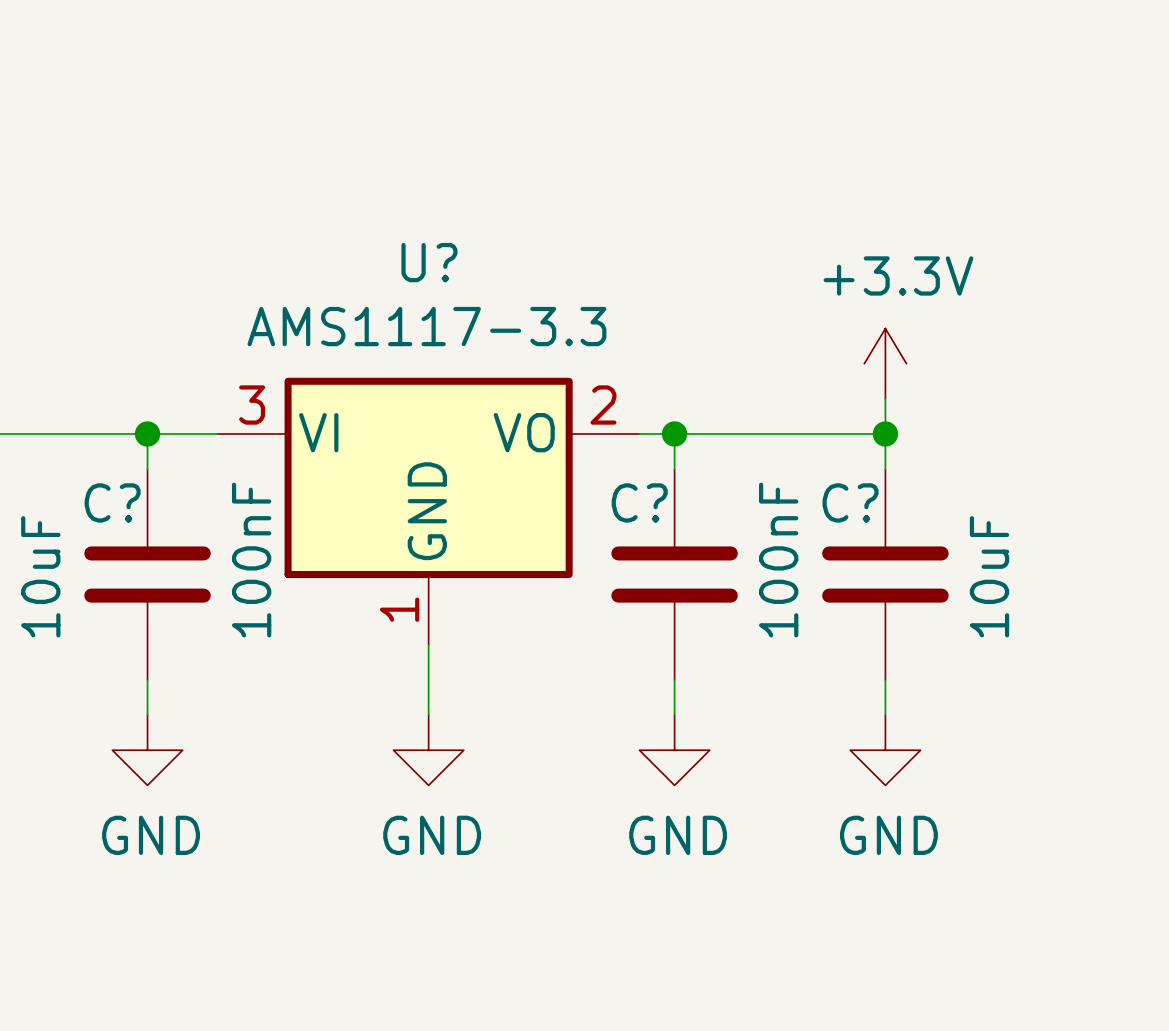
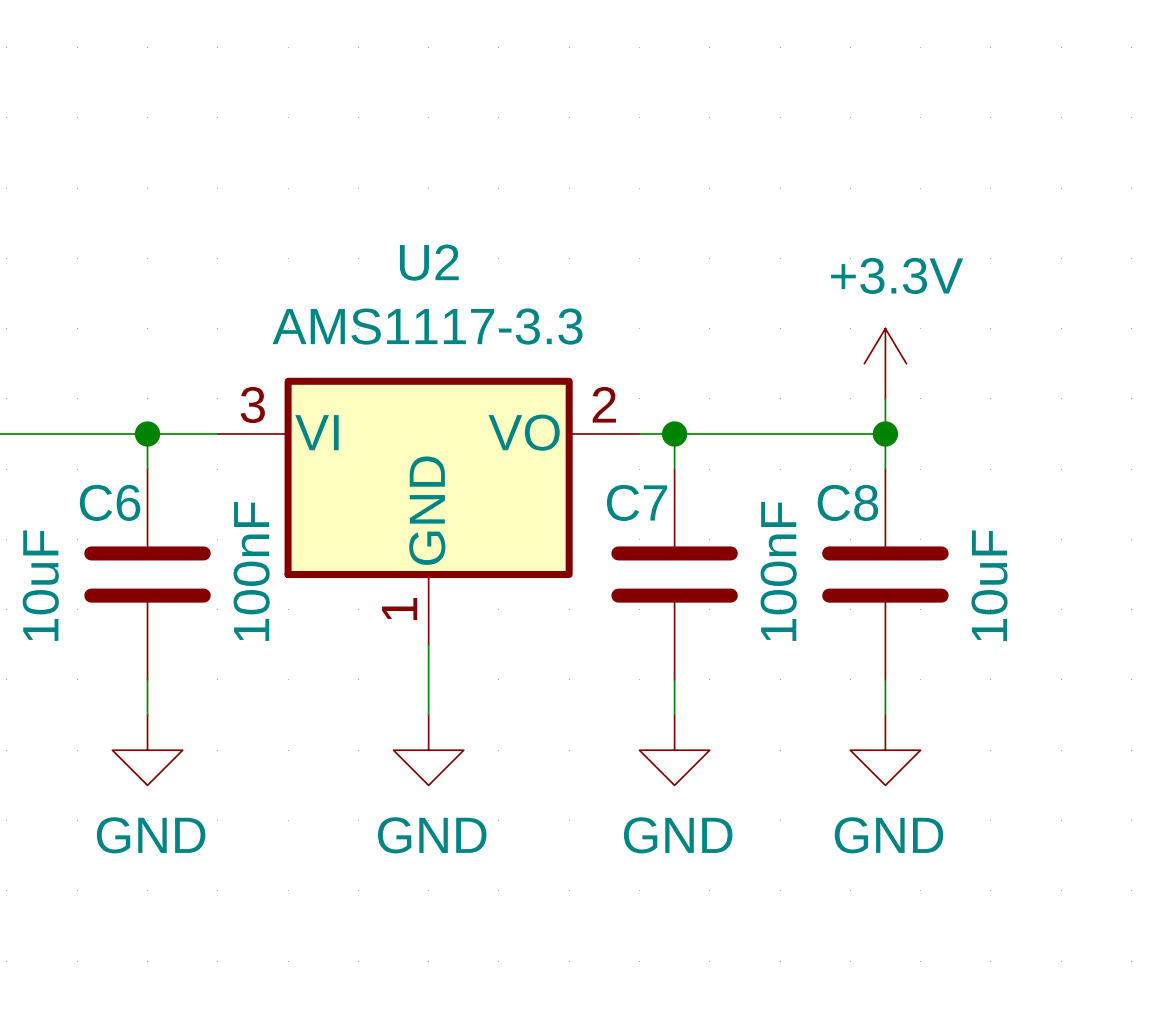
U? name: U? (429, 262) -> U2 (429, 262)
C? name: C? (112, 502) -> C6 (110, 502)
C? name: C? (639, 502) -> C7 (636, 502)
C? name: C? (850, 502) -> C8 (847, 502)

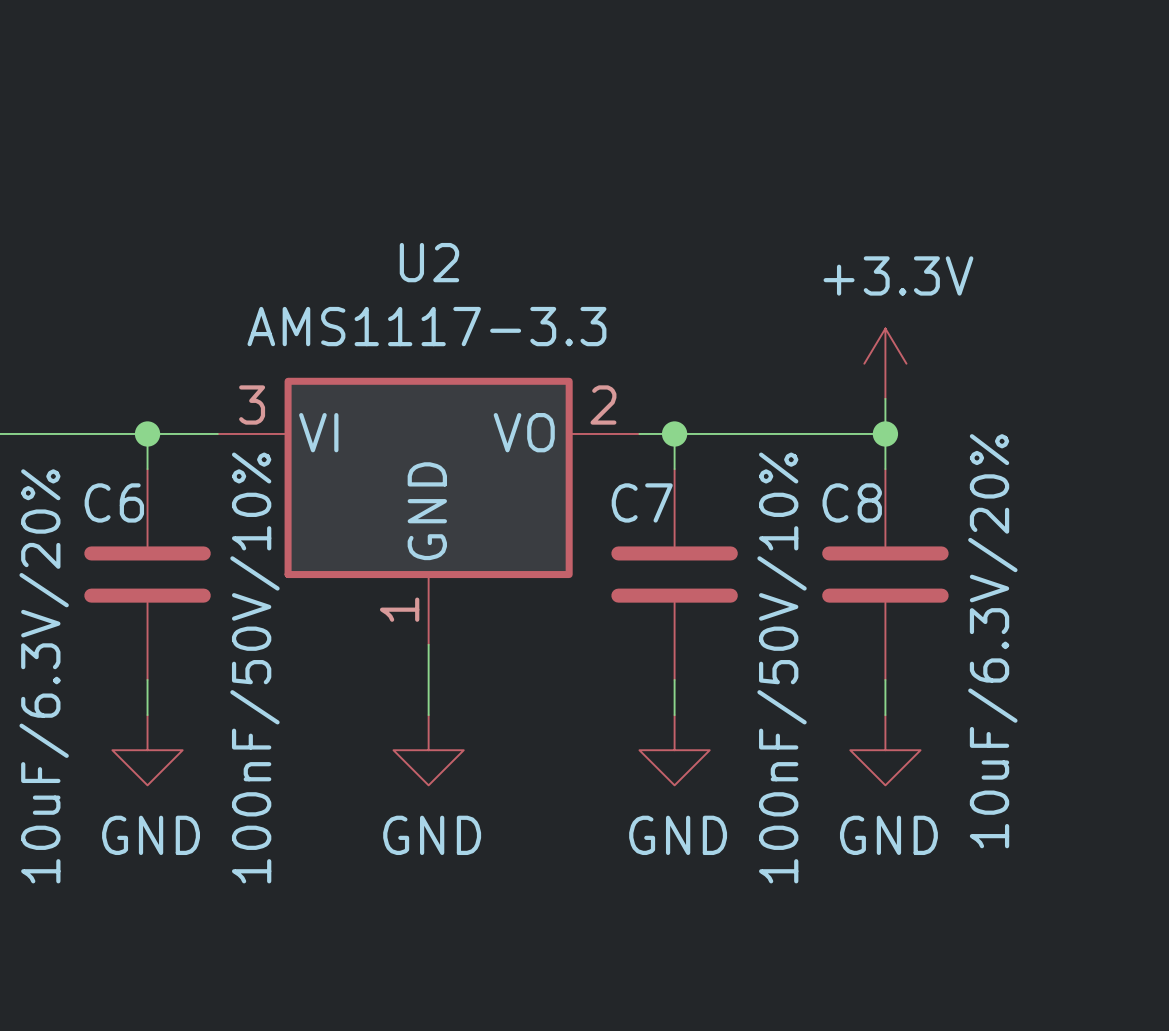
C6 value: 100nF (251, 571) -> 100nF/50V/10% (254, 667)
C7 value: 100nF (778, 571) -> 100nF/50V/10% (782, 667)
part value: 10uF (40, 585) -> 10uF/6.3V/20% (44, 676)
C8 value: 10uF (989, 585) -> 10uF/6.3V/20% (992, 641)

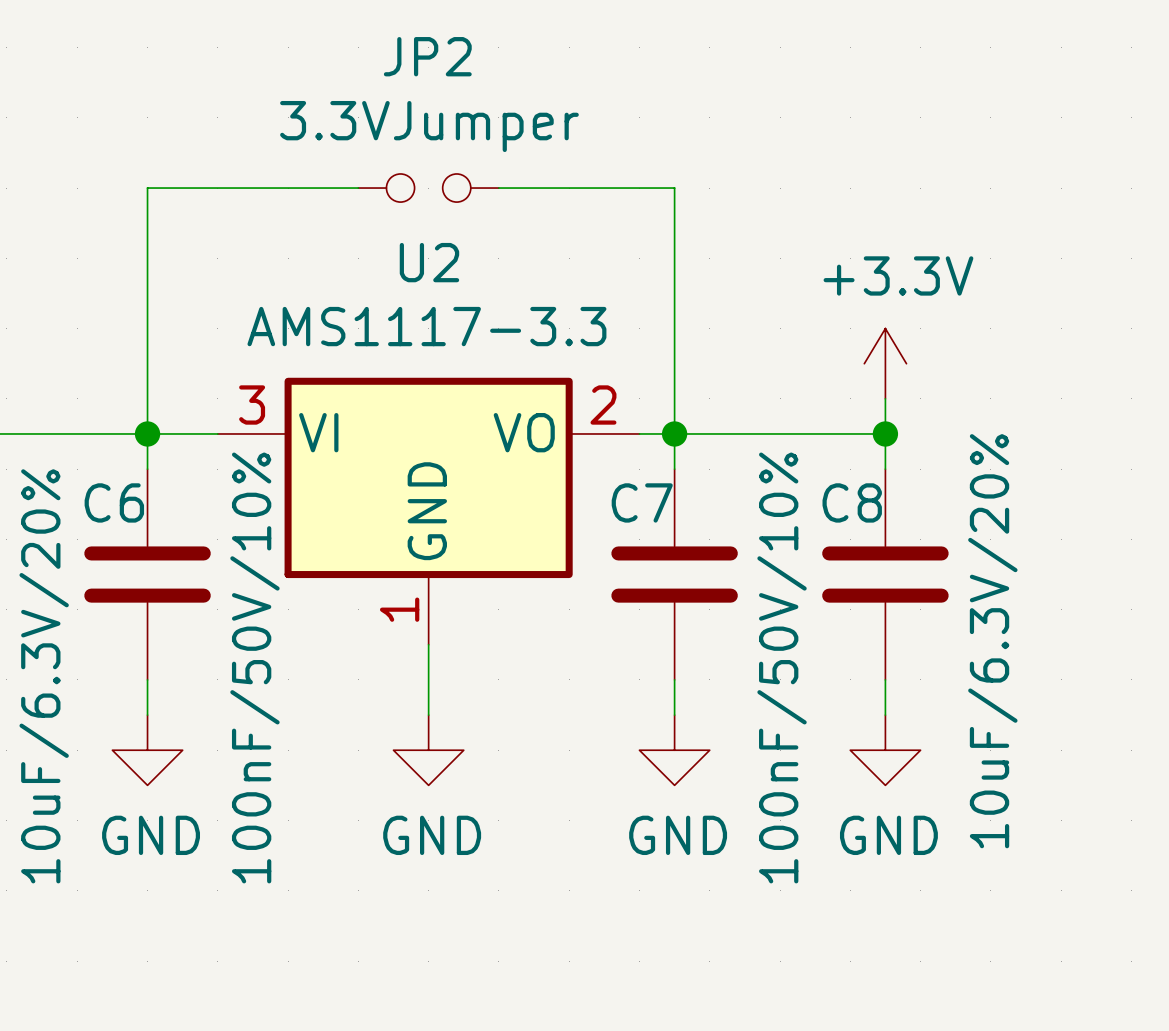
wire: none -> (358, 188) (147, 188) (147, 433)
JP2: none -> 3.3VJumper (428, 188)
wire: none -> (498, 188) (674, 188) (674, 433)

